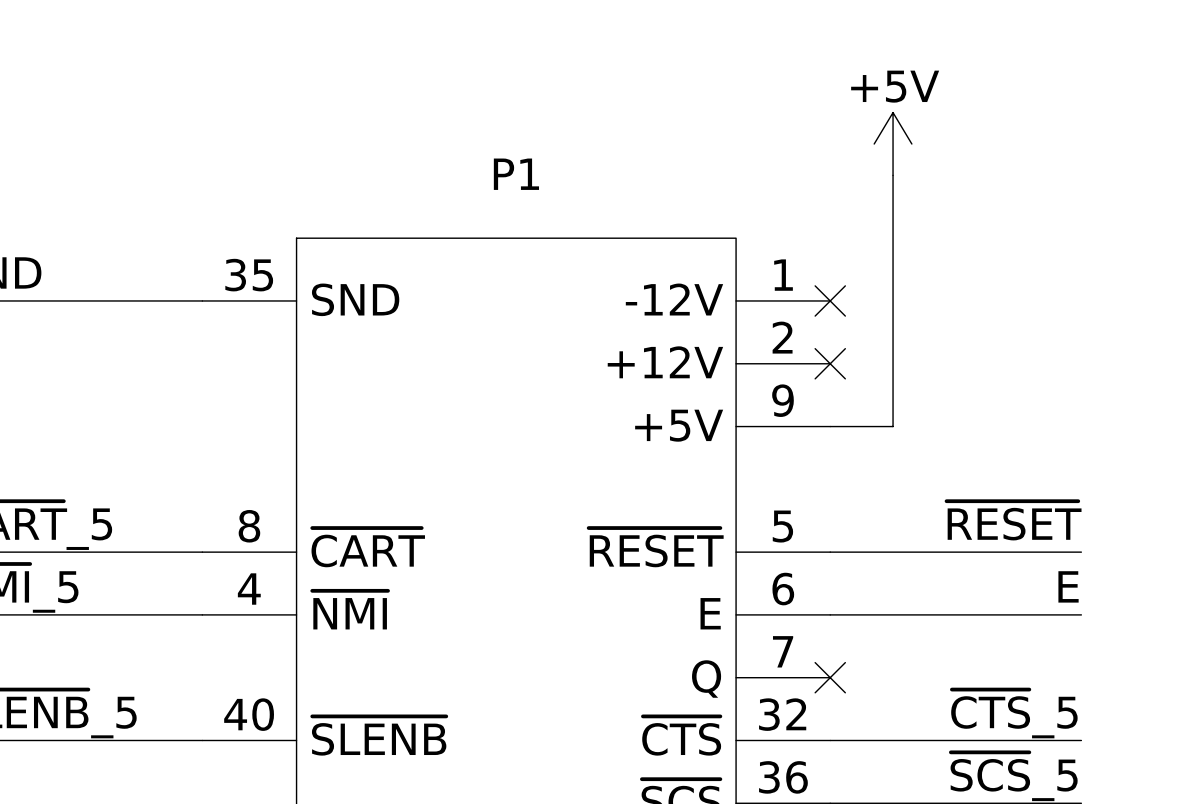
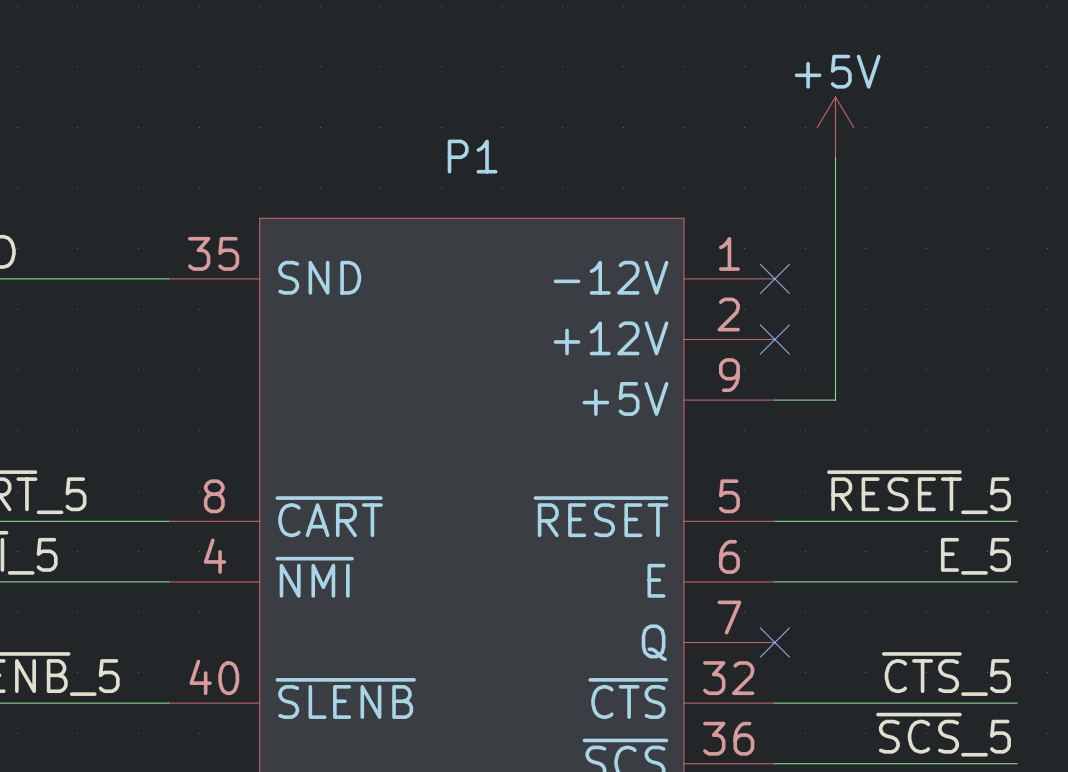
label: ~{RESET} (1014, 520) -> ~{RESET}_5 (919, 492)
label: E (1068, 586) -> E_5 (975, 556)

